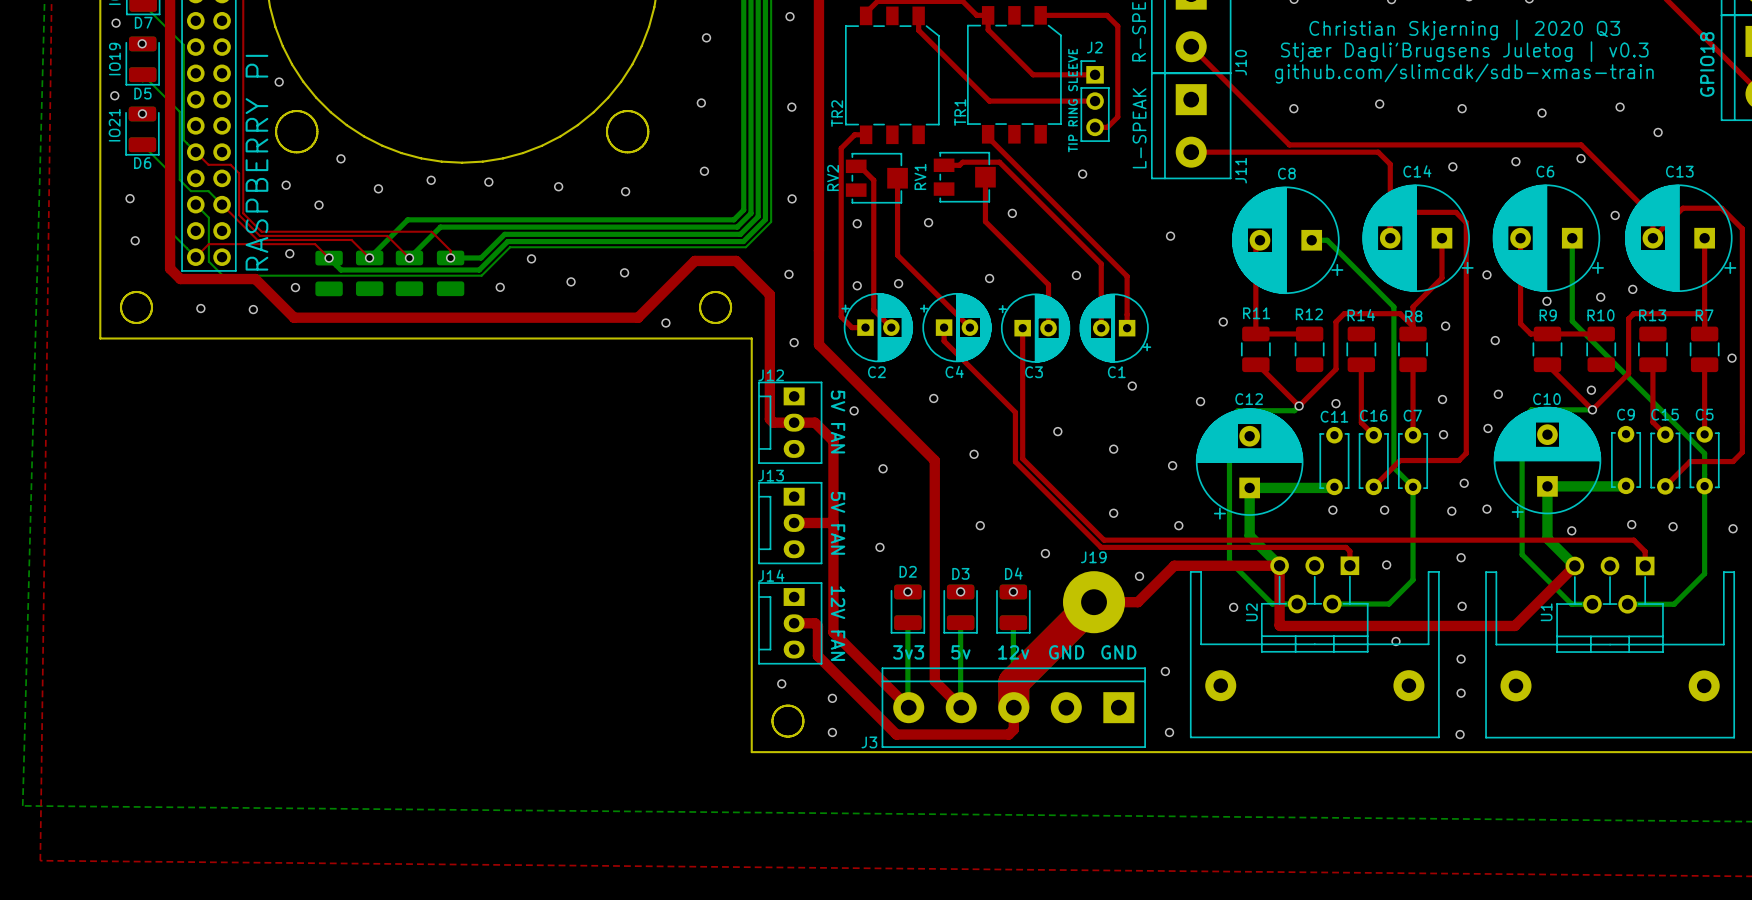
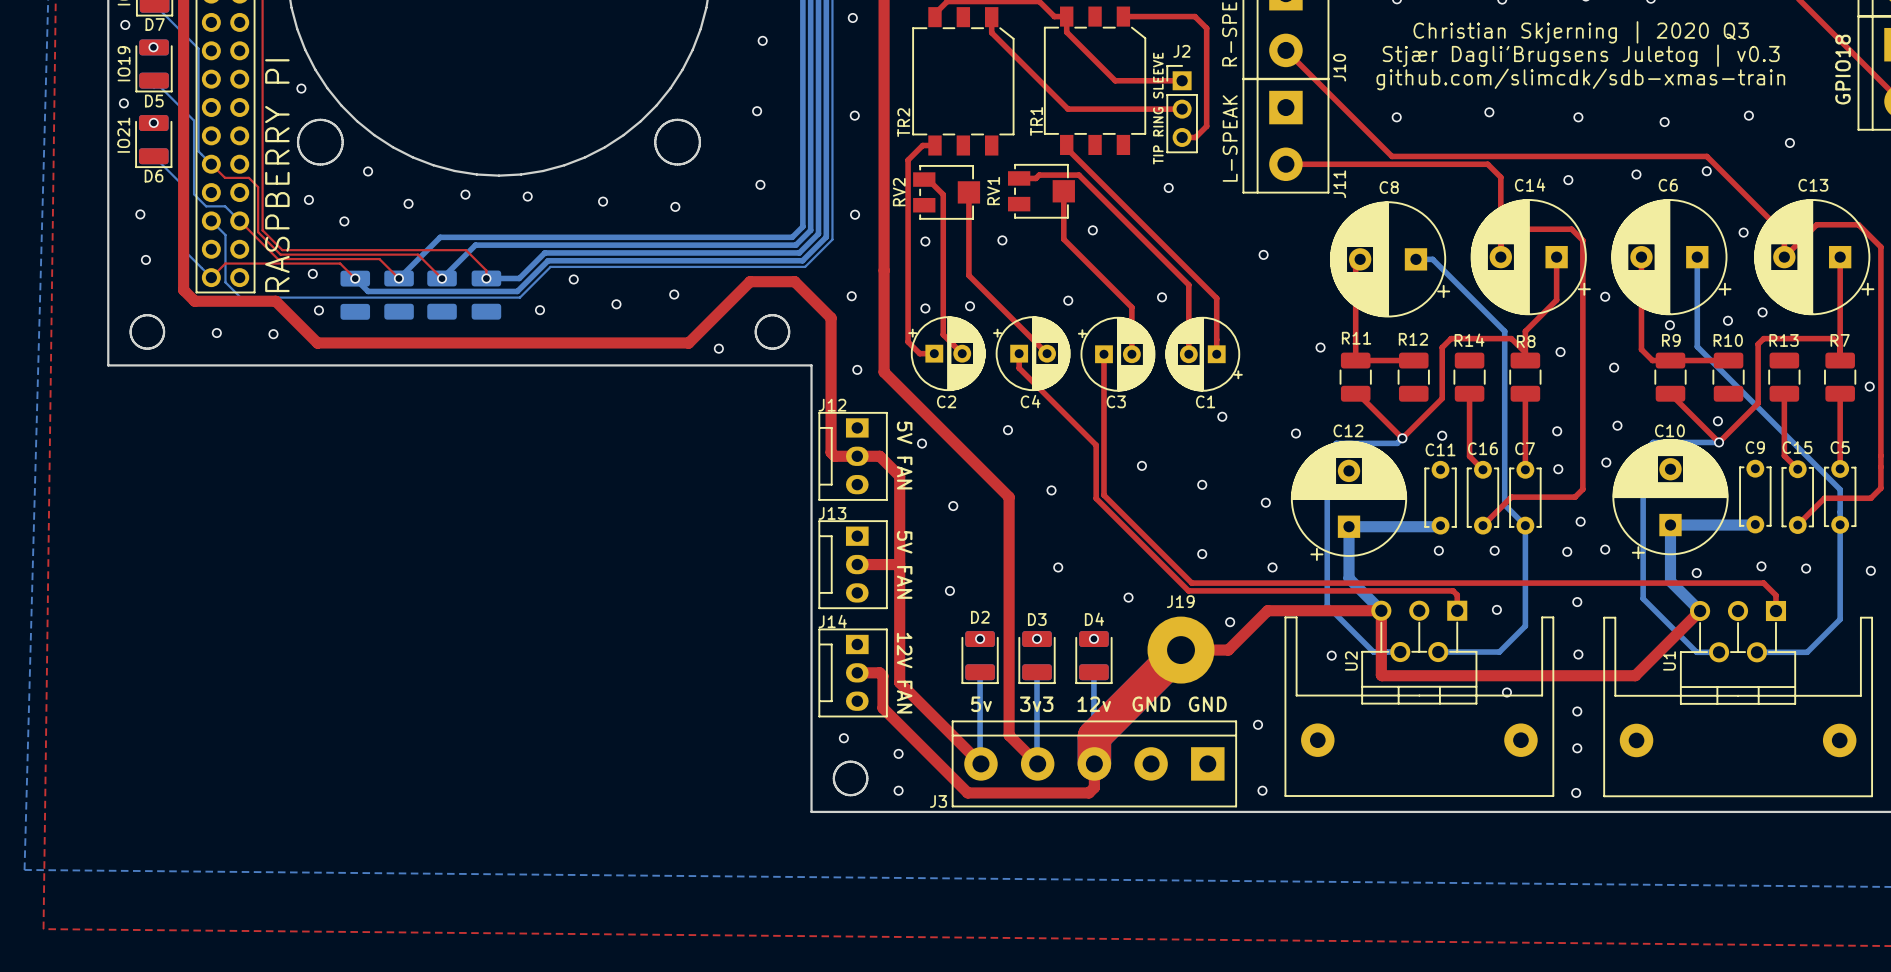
text: 3v3 (908, 652) -> 5v (981, 704)
text: 5v (960, 652) -> 3v3 (1036, 704)

